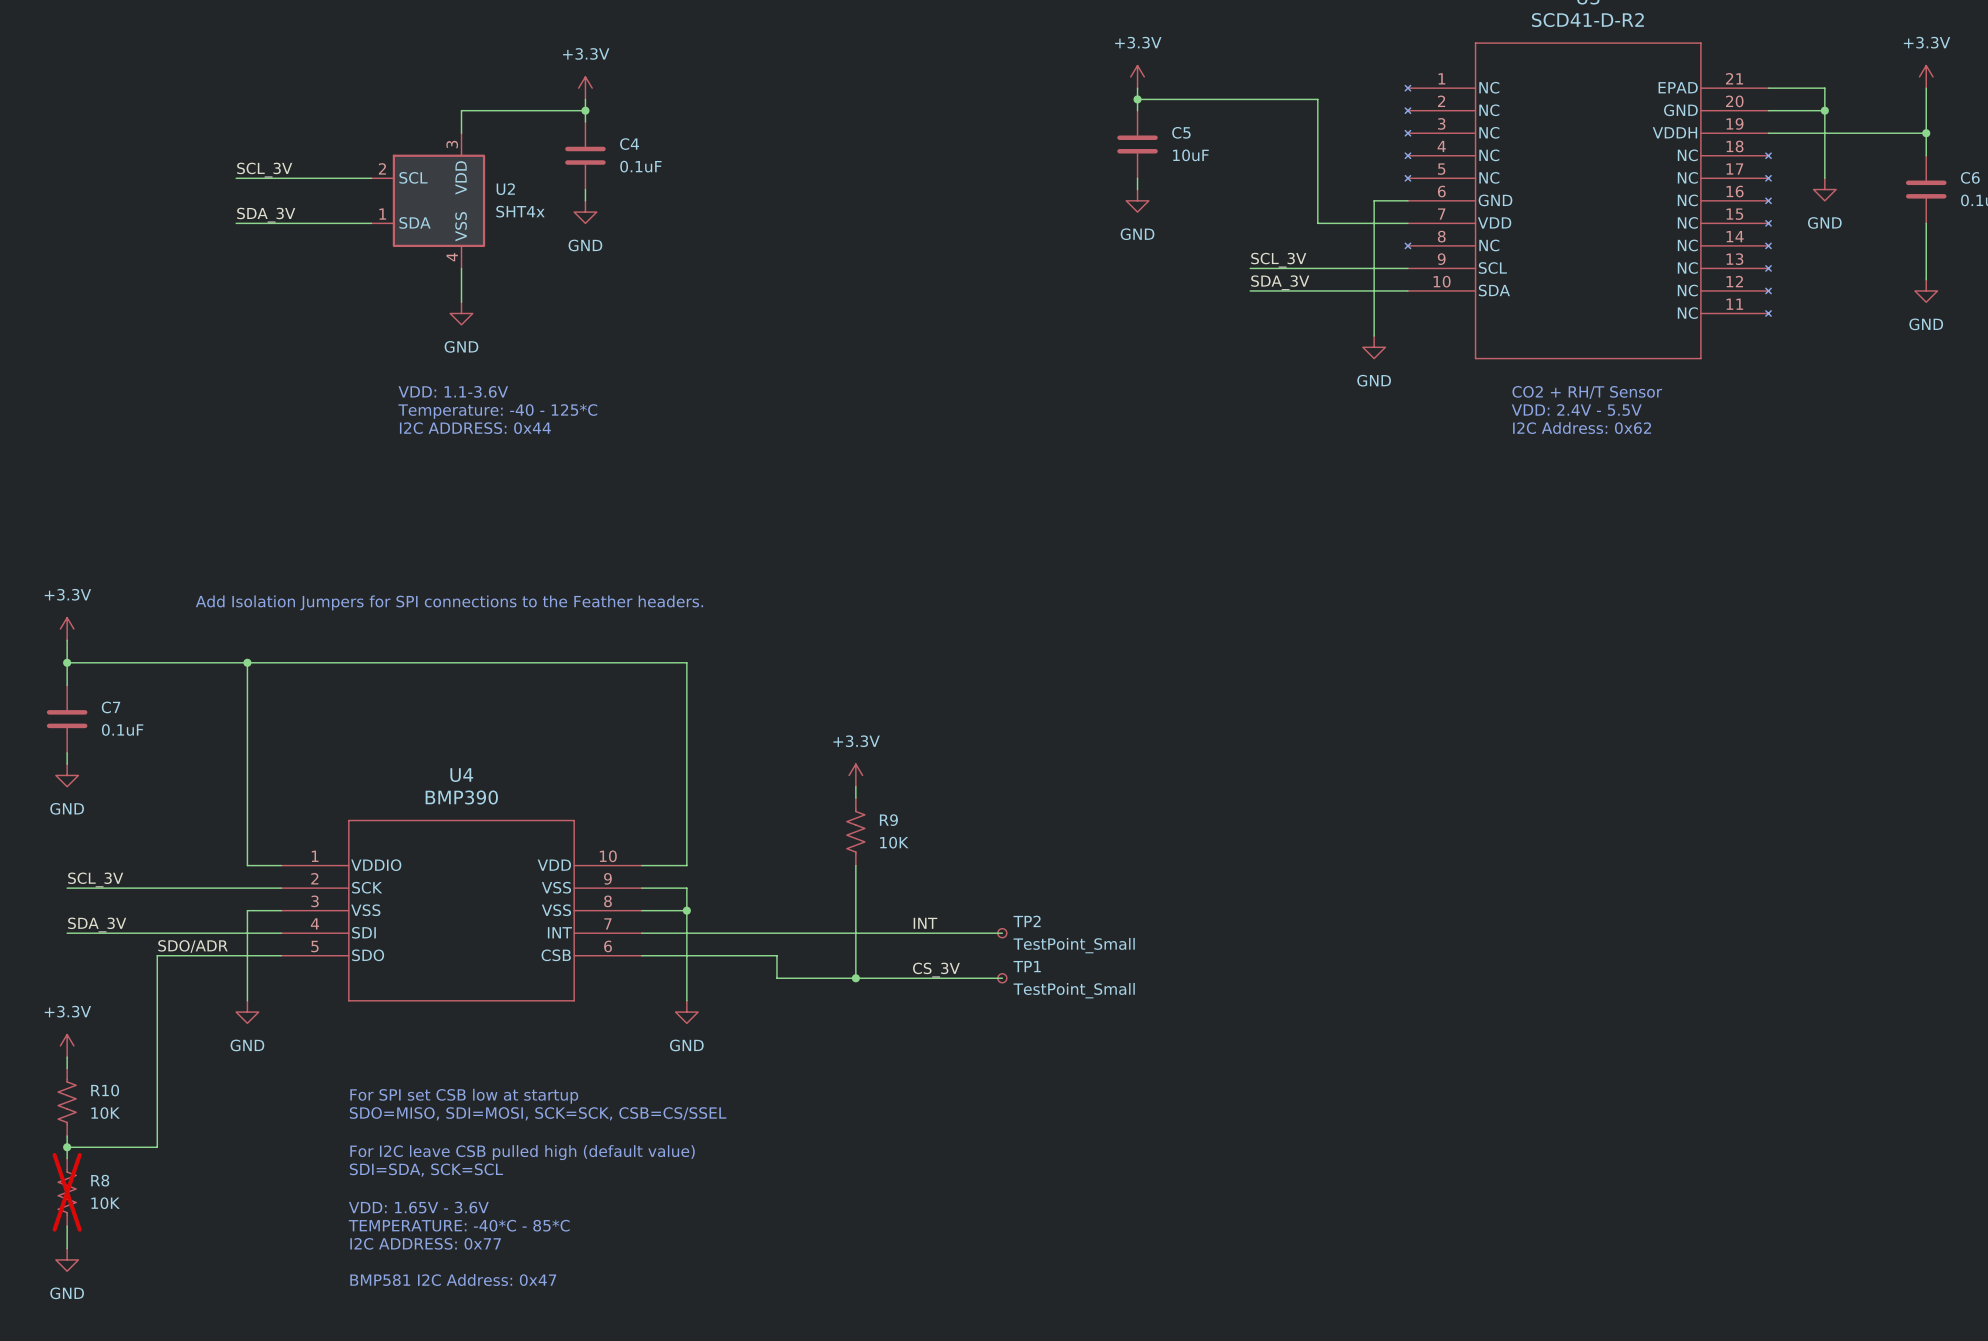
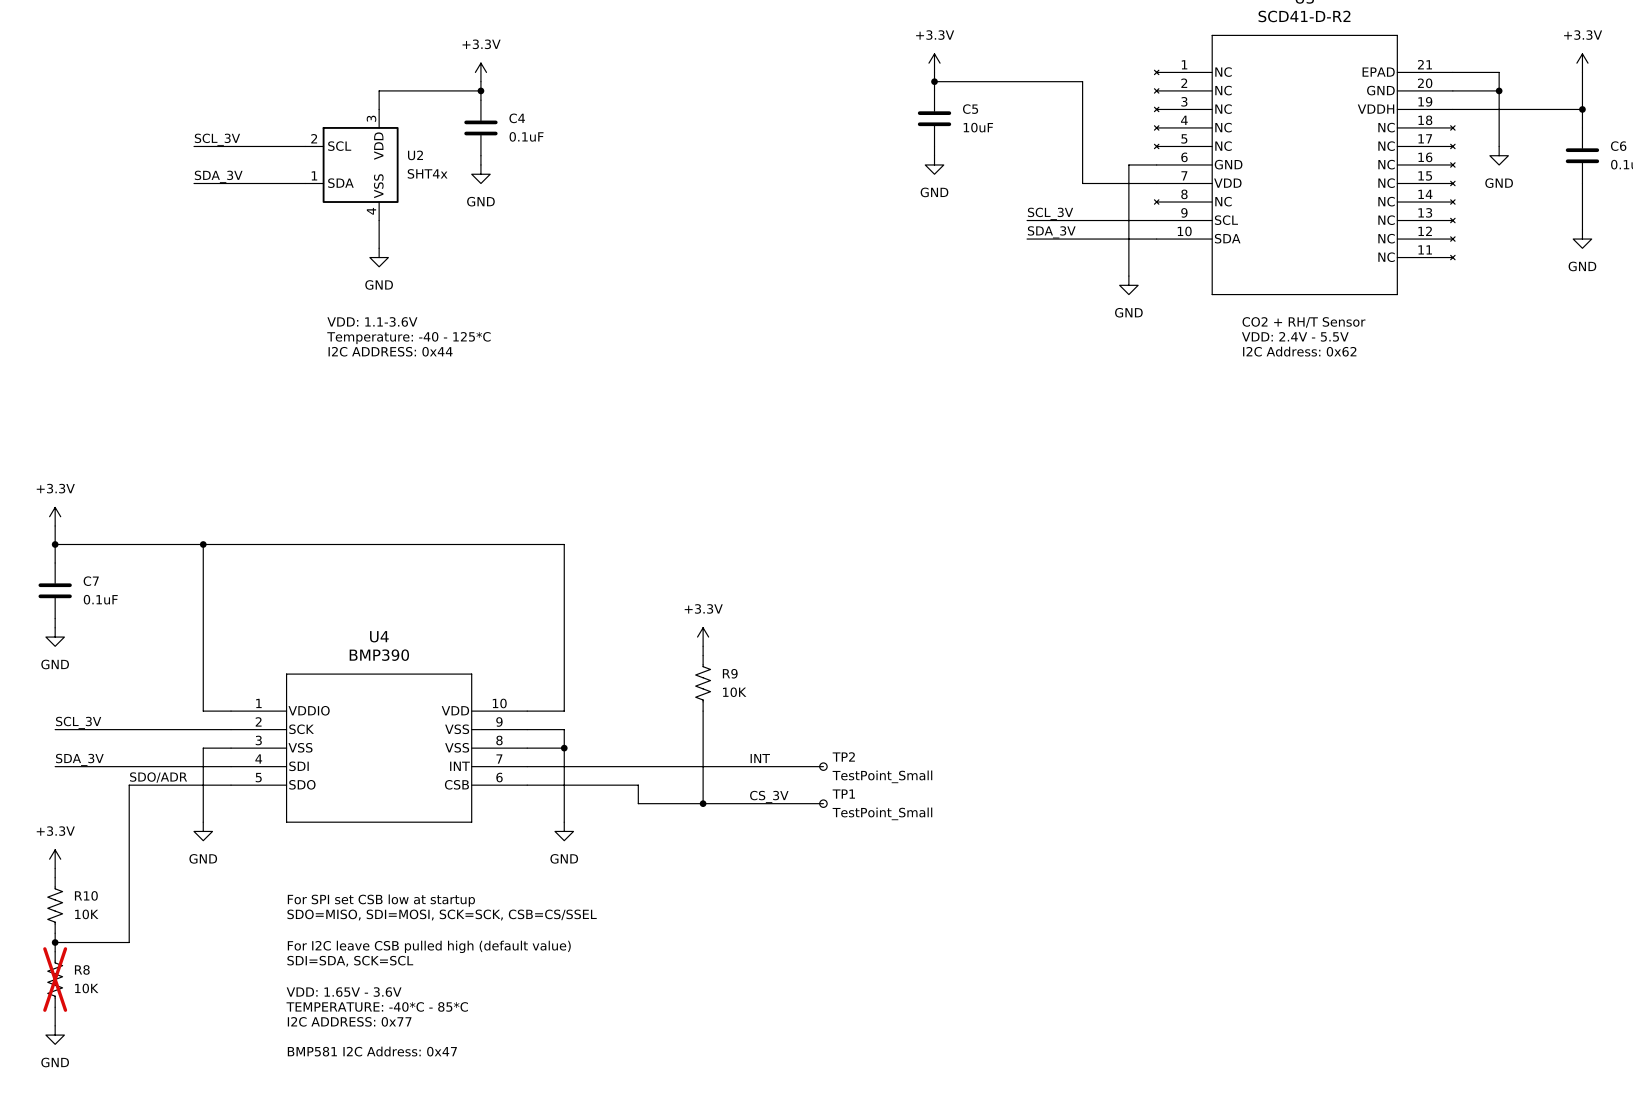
text: Add Isolation Jumpers for SPI connections to the Feather headers. (449, 602) -> none

